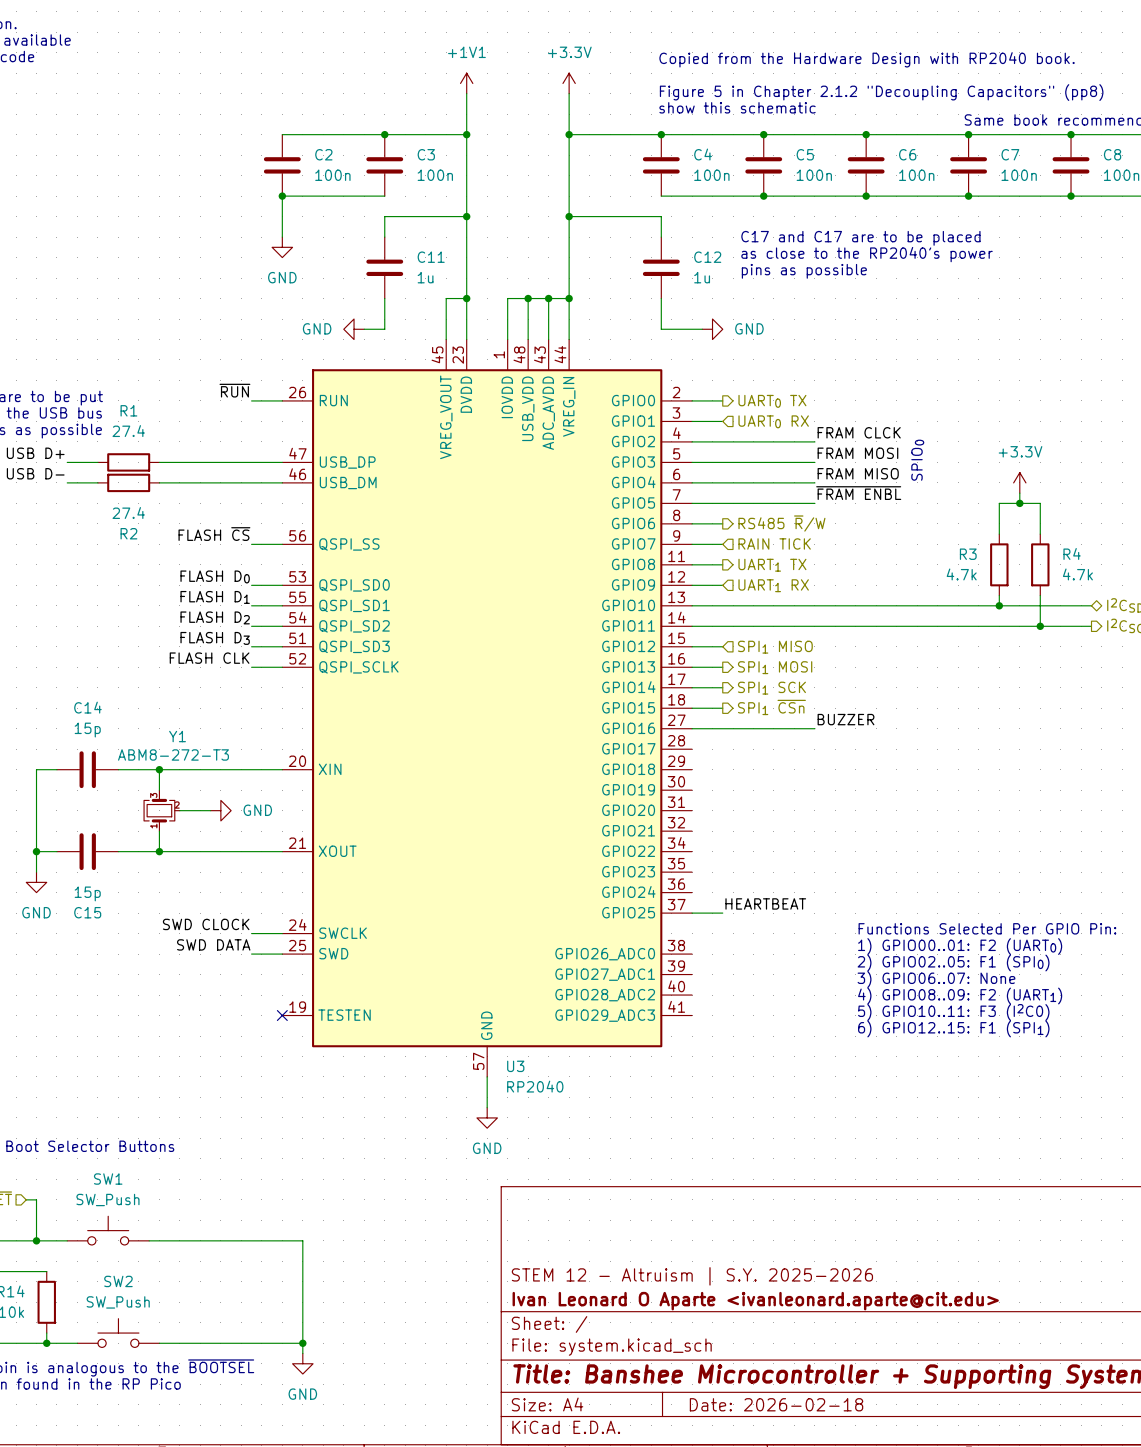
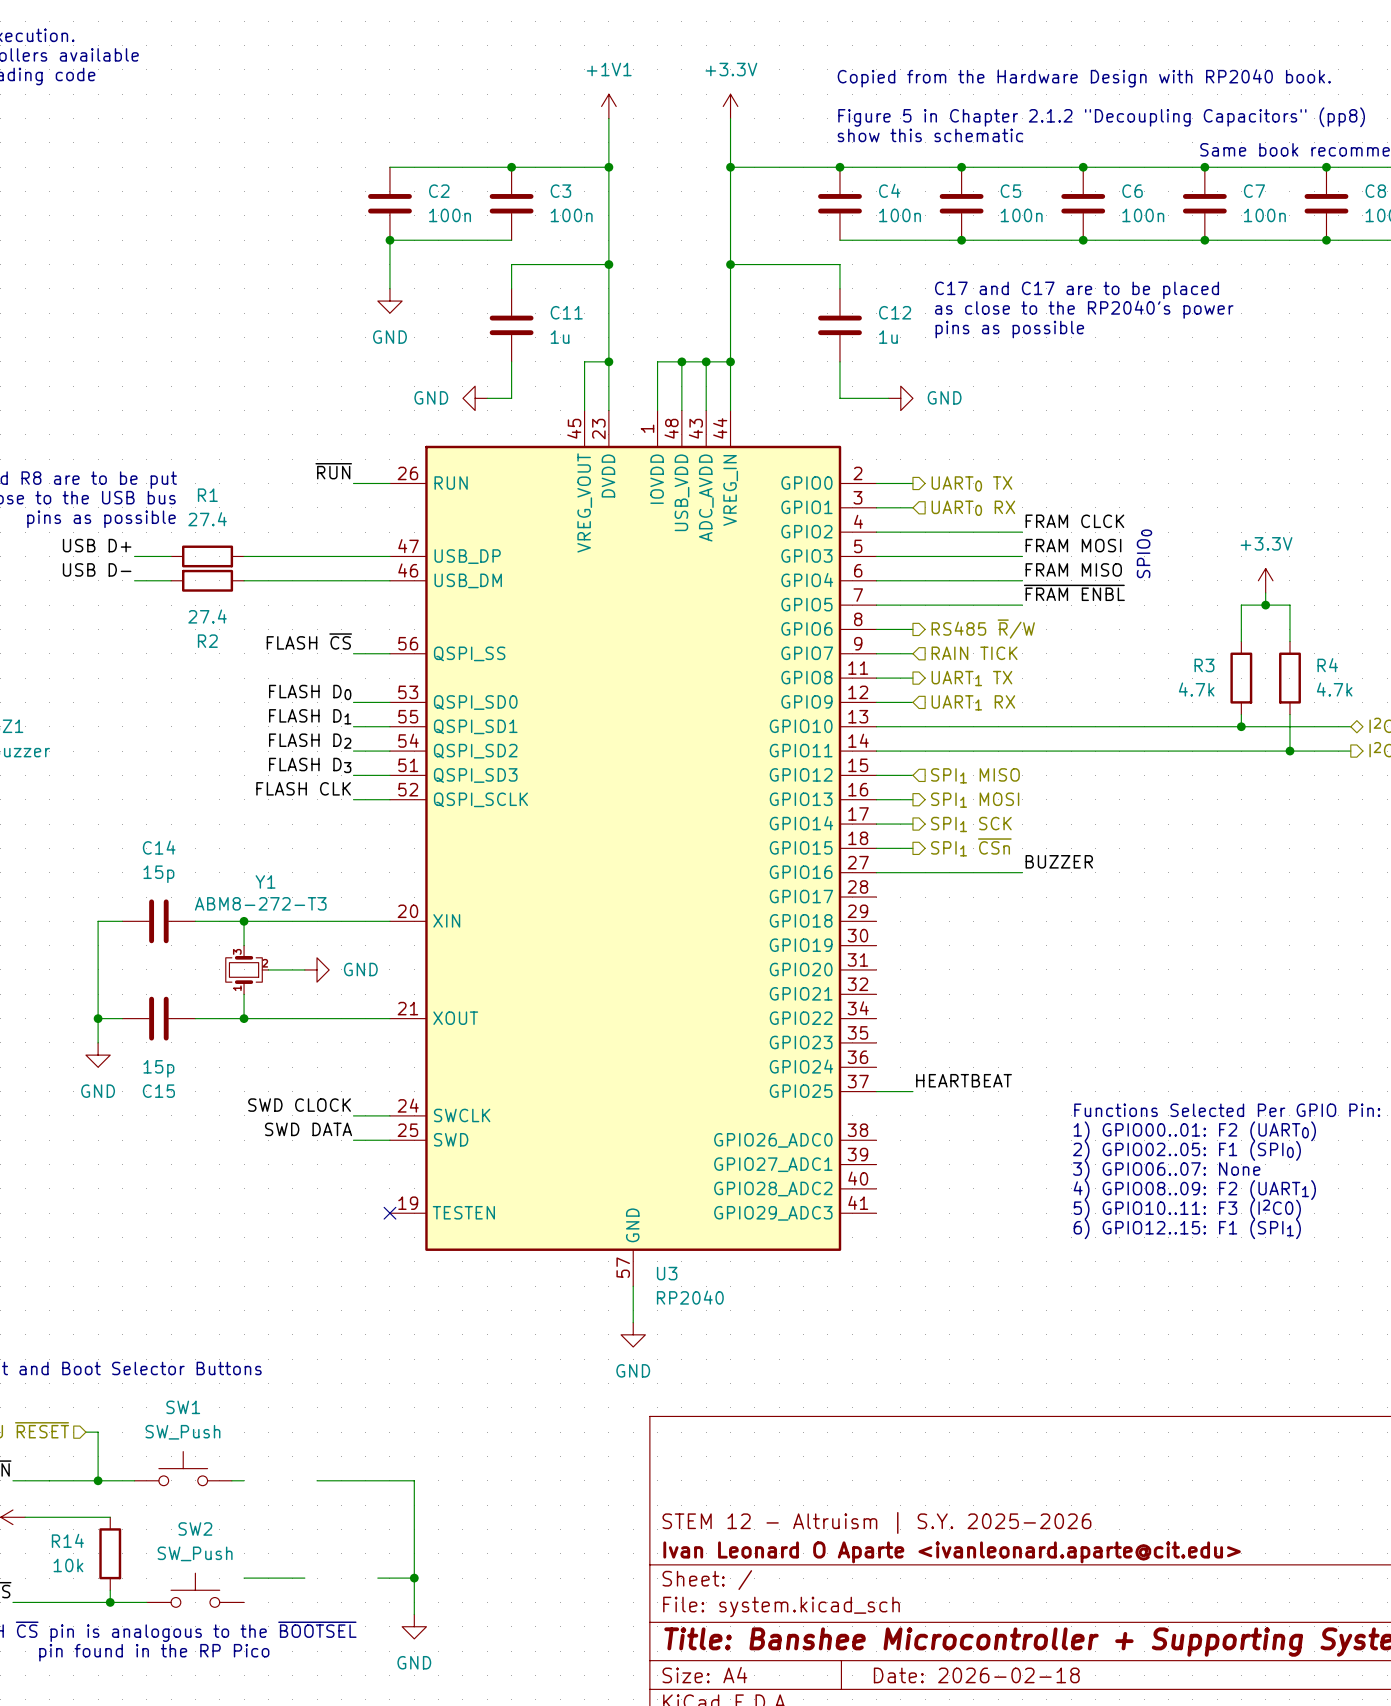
wire: (159, 1240) (220, 1240) -> none
wire: none -> (244, 1578) (304, 1578)
wire: none -> (377, 1578) (414, 1578)
wire: (159, 1343) (302, 1343) -> none
junction position: (302, 1343) -> (414, 1578)

